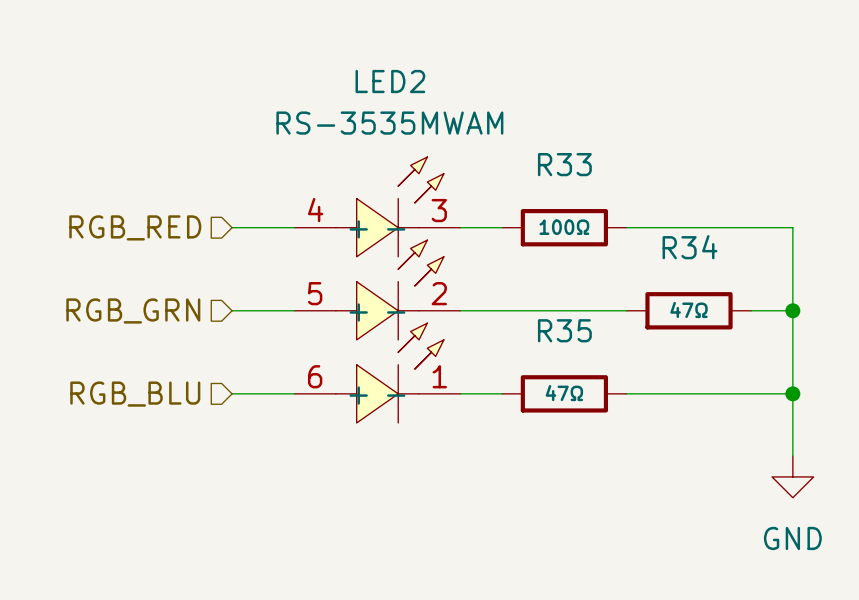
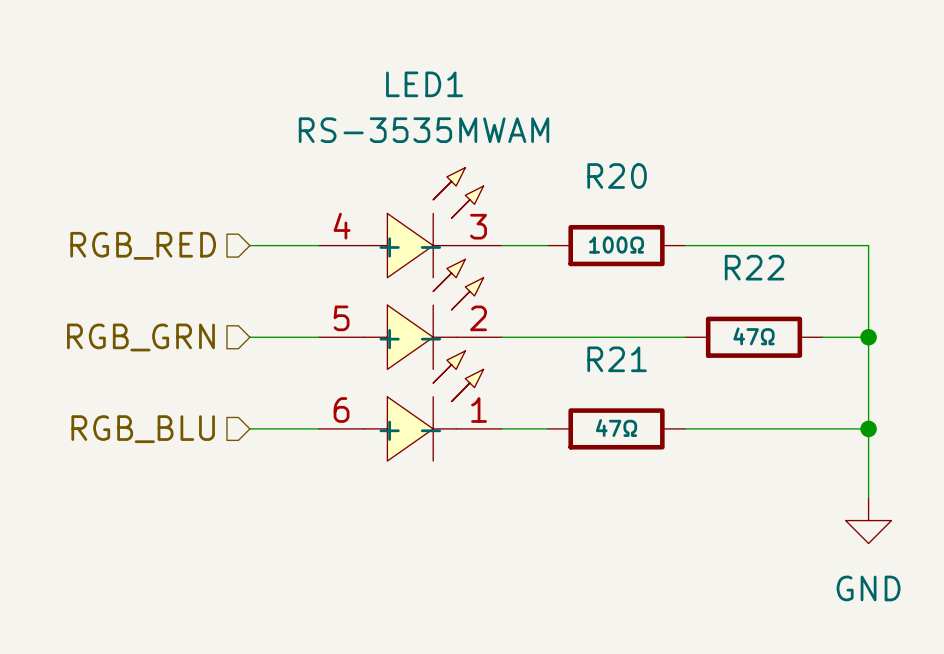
LED2 name: LED2 (390, 81) -> LED1 (424, 84)
R33 name: R33 (564, 164) -> R20 (617, 176)
R34 name: R34 (690, 247) -> R22 (754, 267)
R35 name: R35 (564, 330) -> R21 (617, 359)

